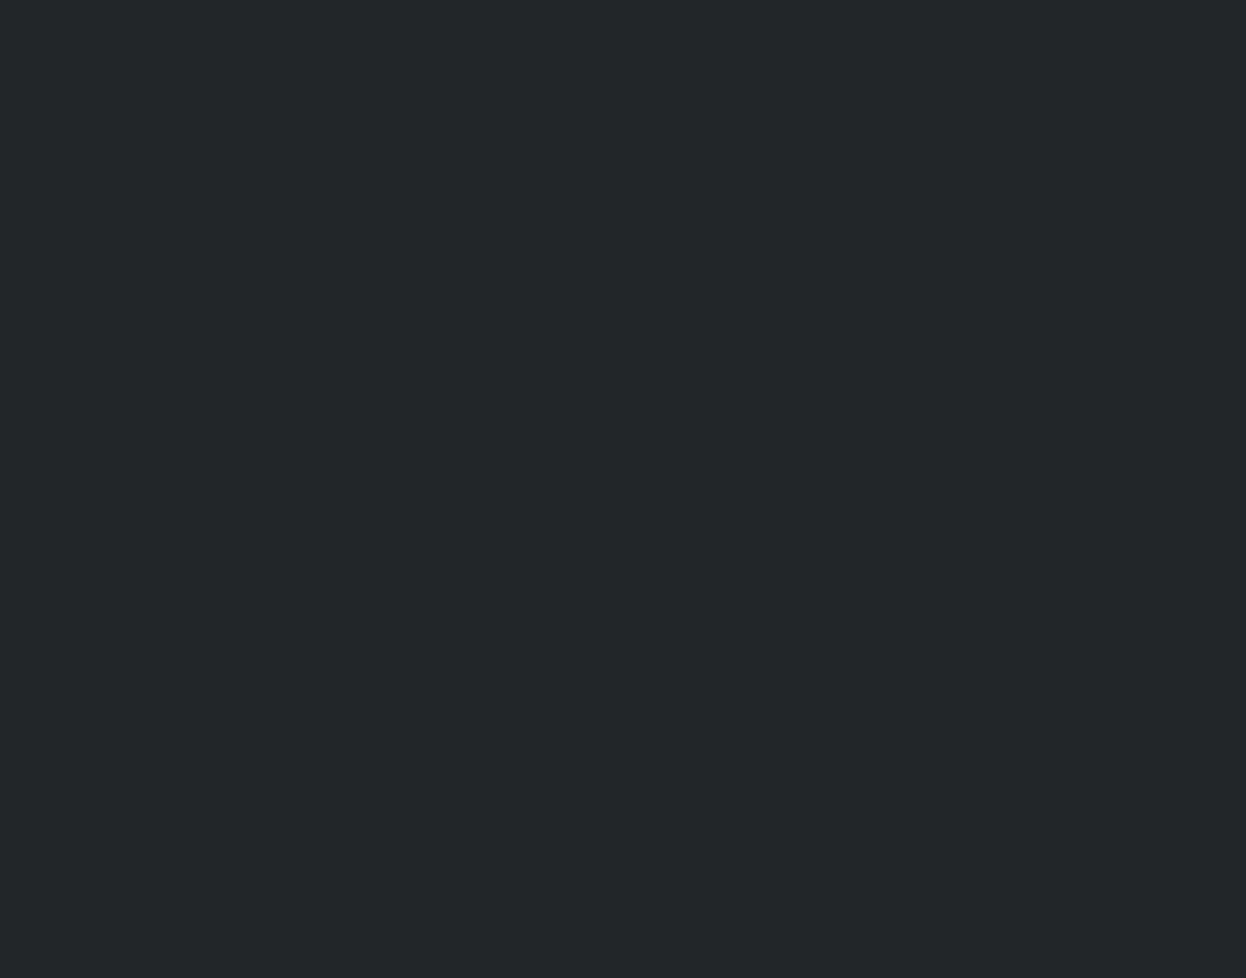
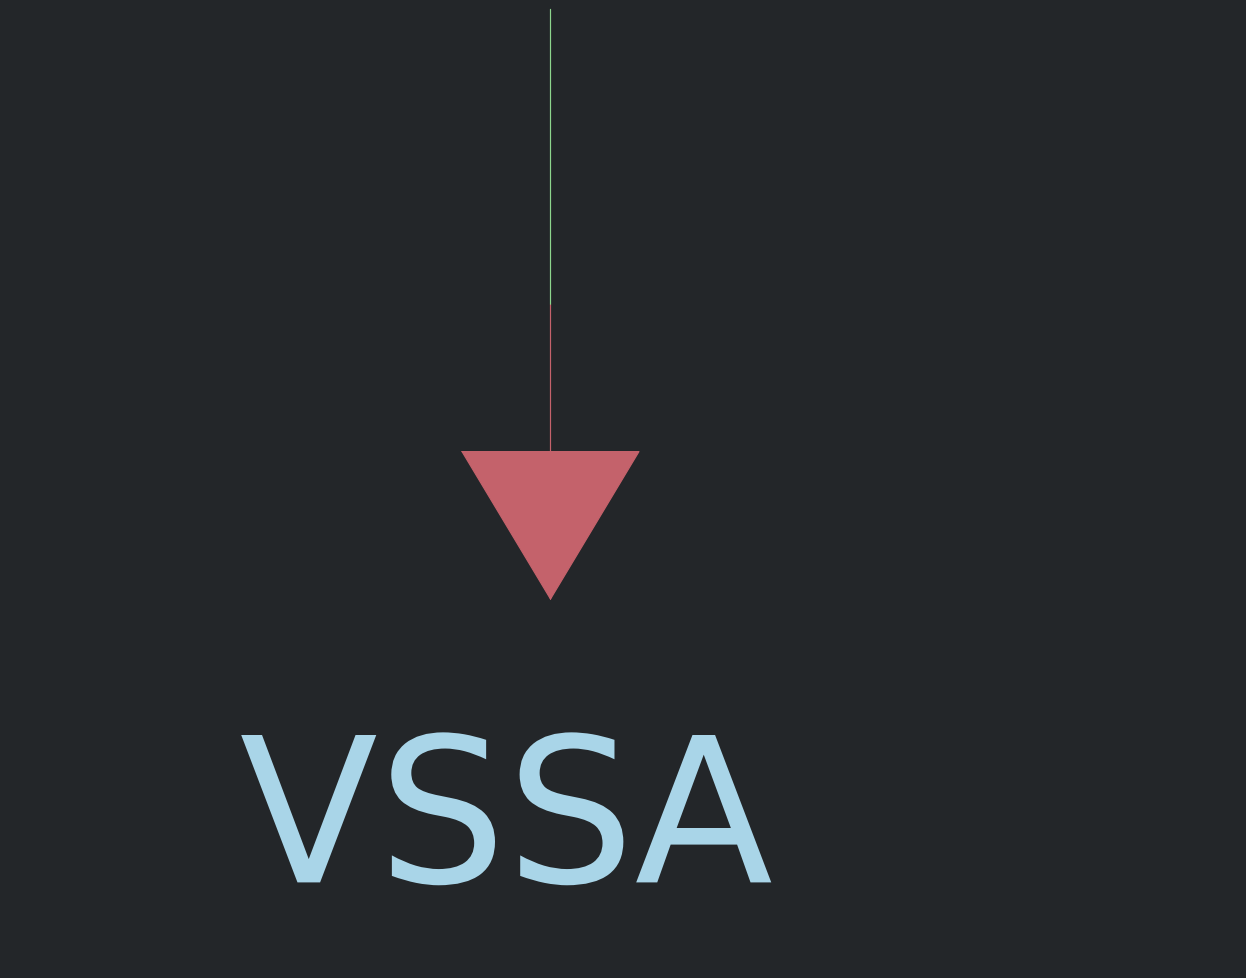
wire: none -> (550, 9) (550, 304)
power symbol: none -> VSSA (550, 451)

